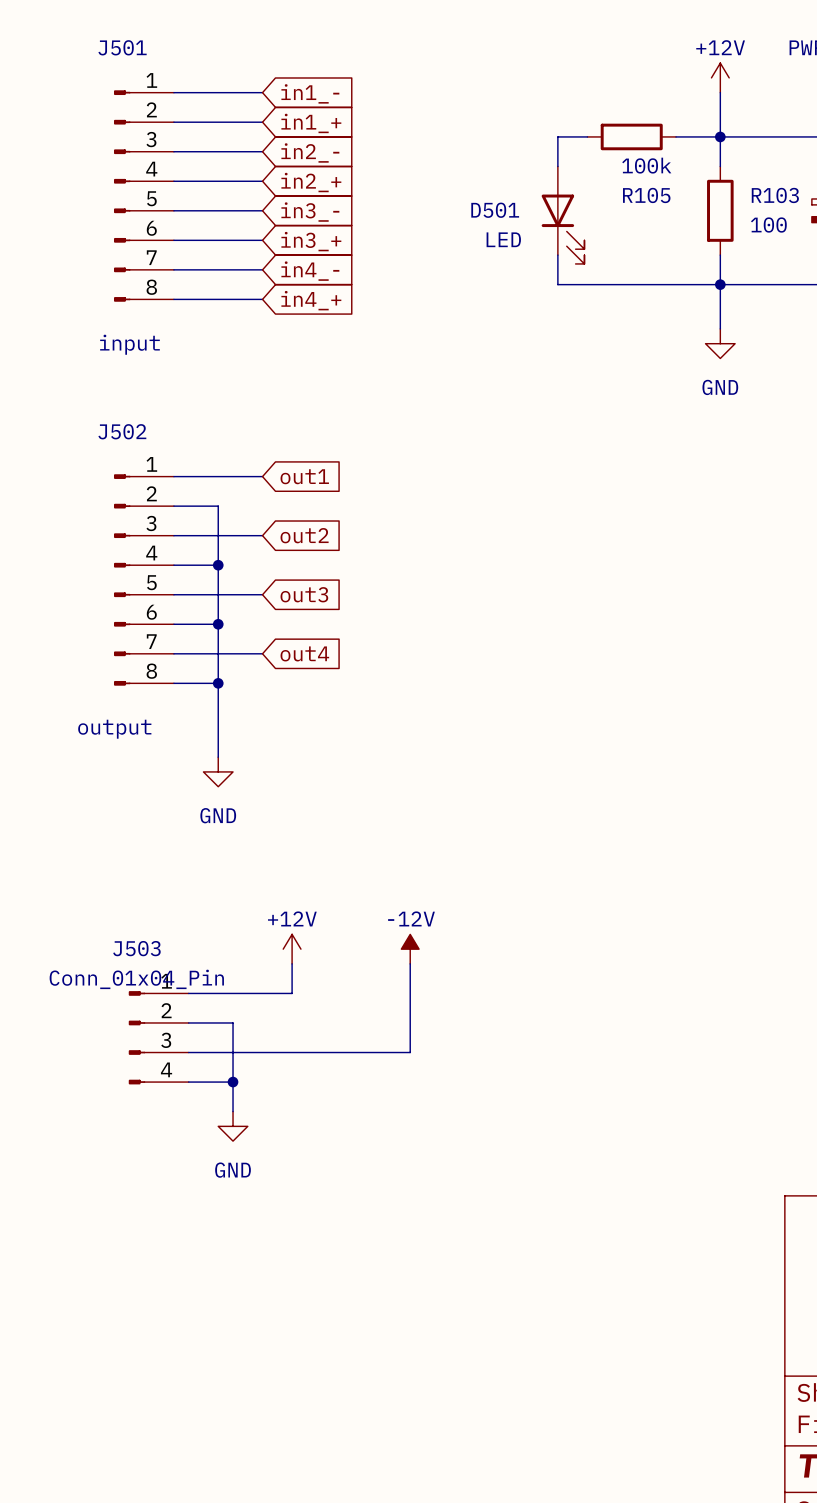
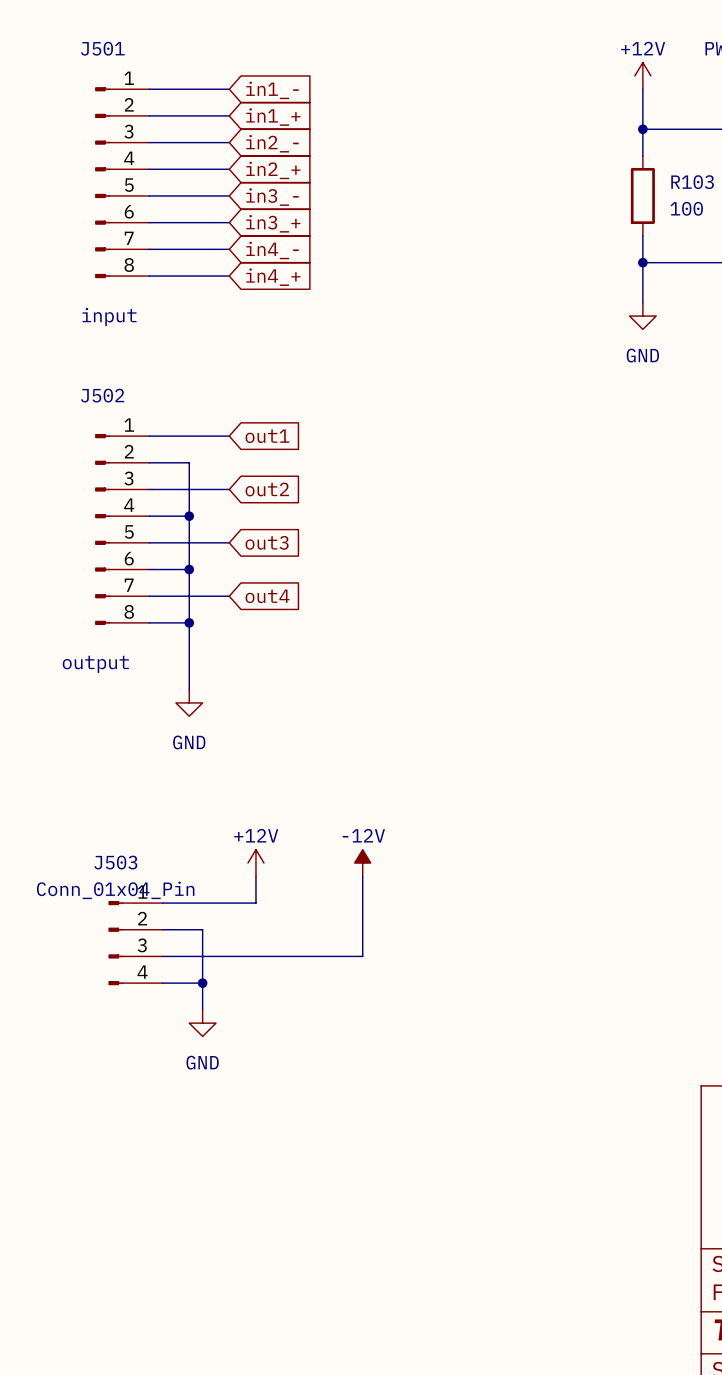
wire: (587, 136) (557, 136) (557, 166) -> none
R105: 100k (631, 136) -> none
wire: (676, 136) (720, 136) -> none
D501: LED (563, 215) -> none
wire: (557, 255) (557, 284) (720, 284) -> none

